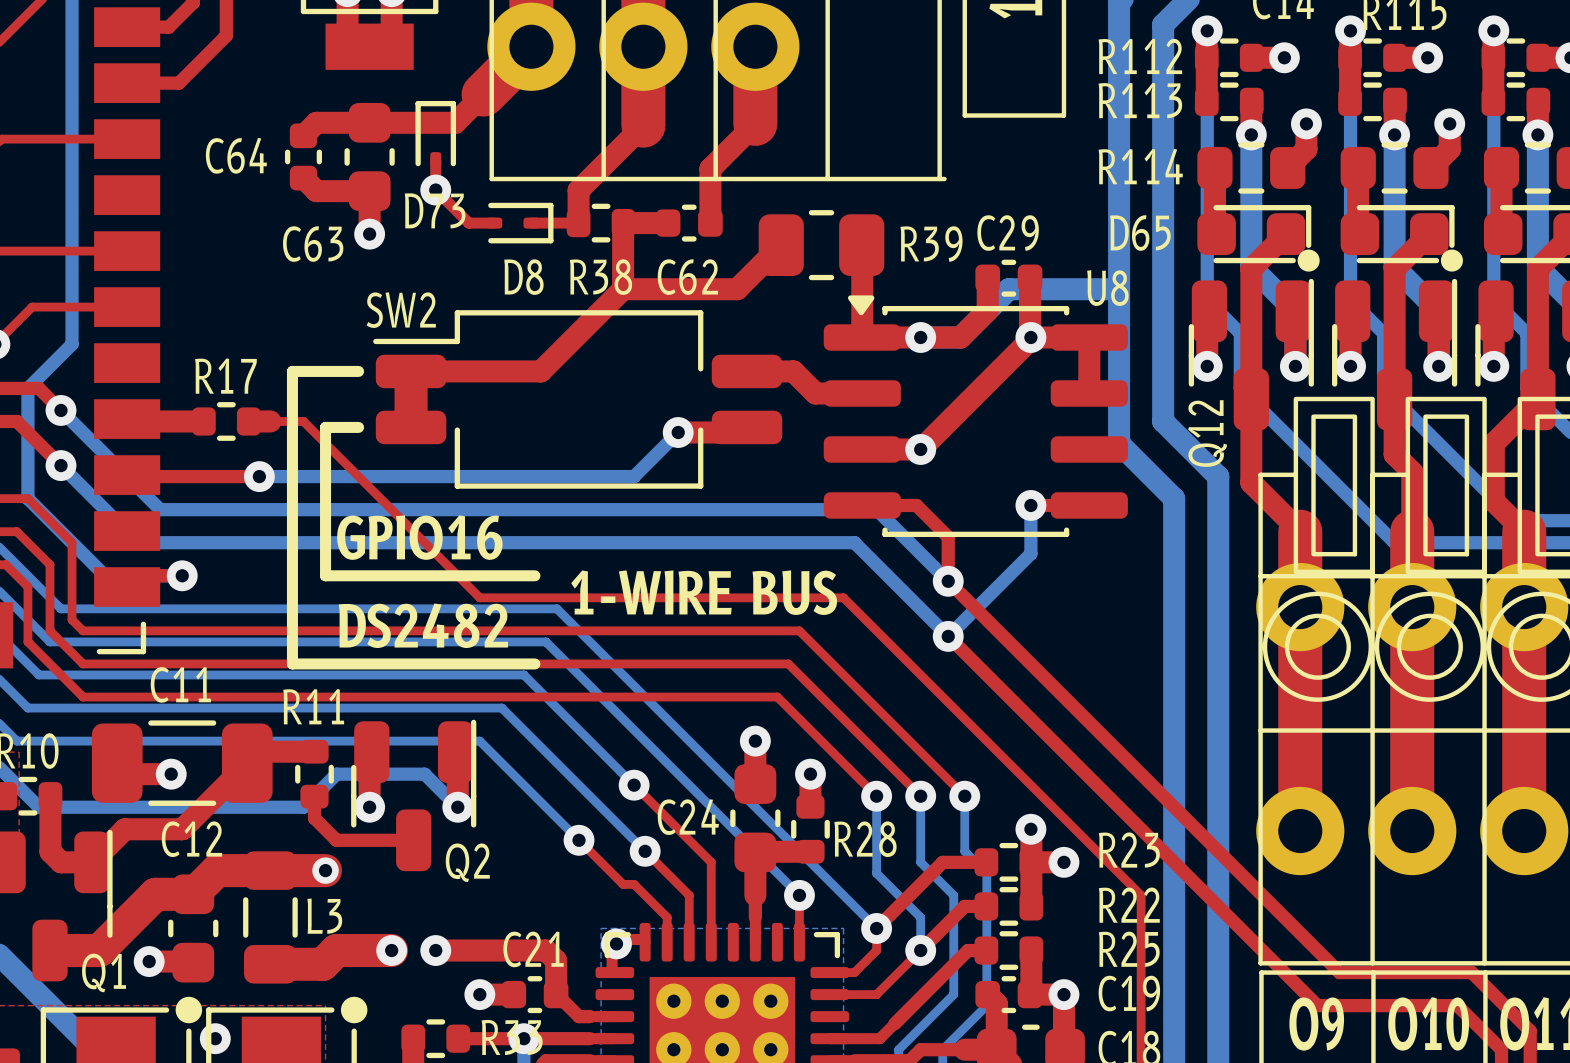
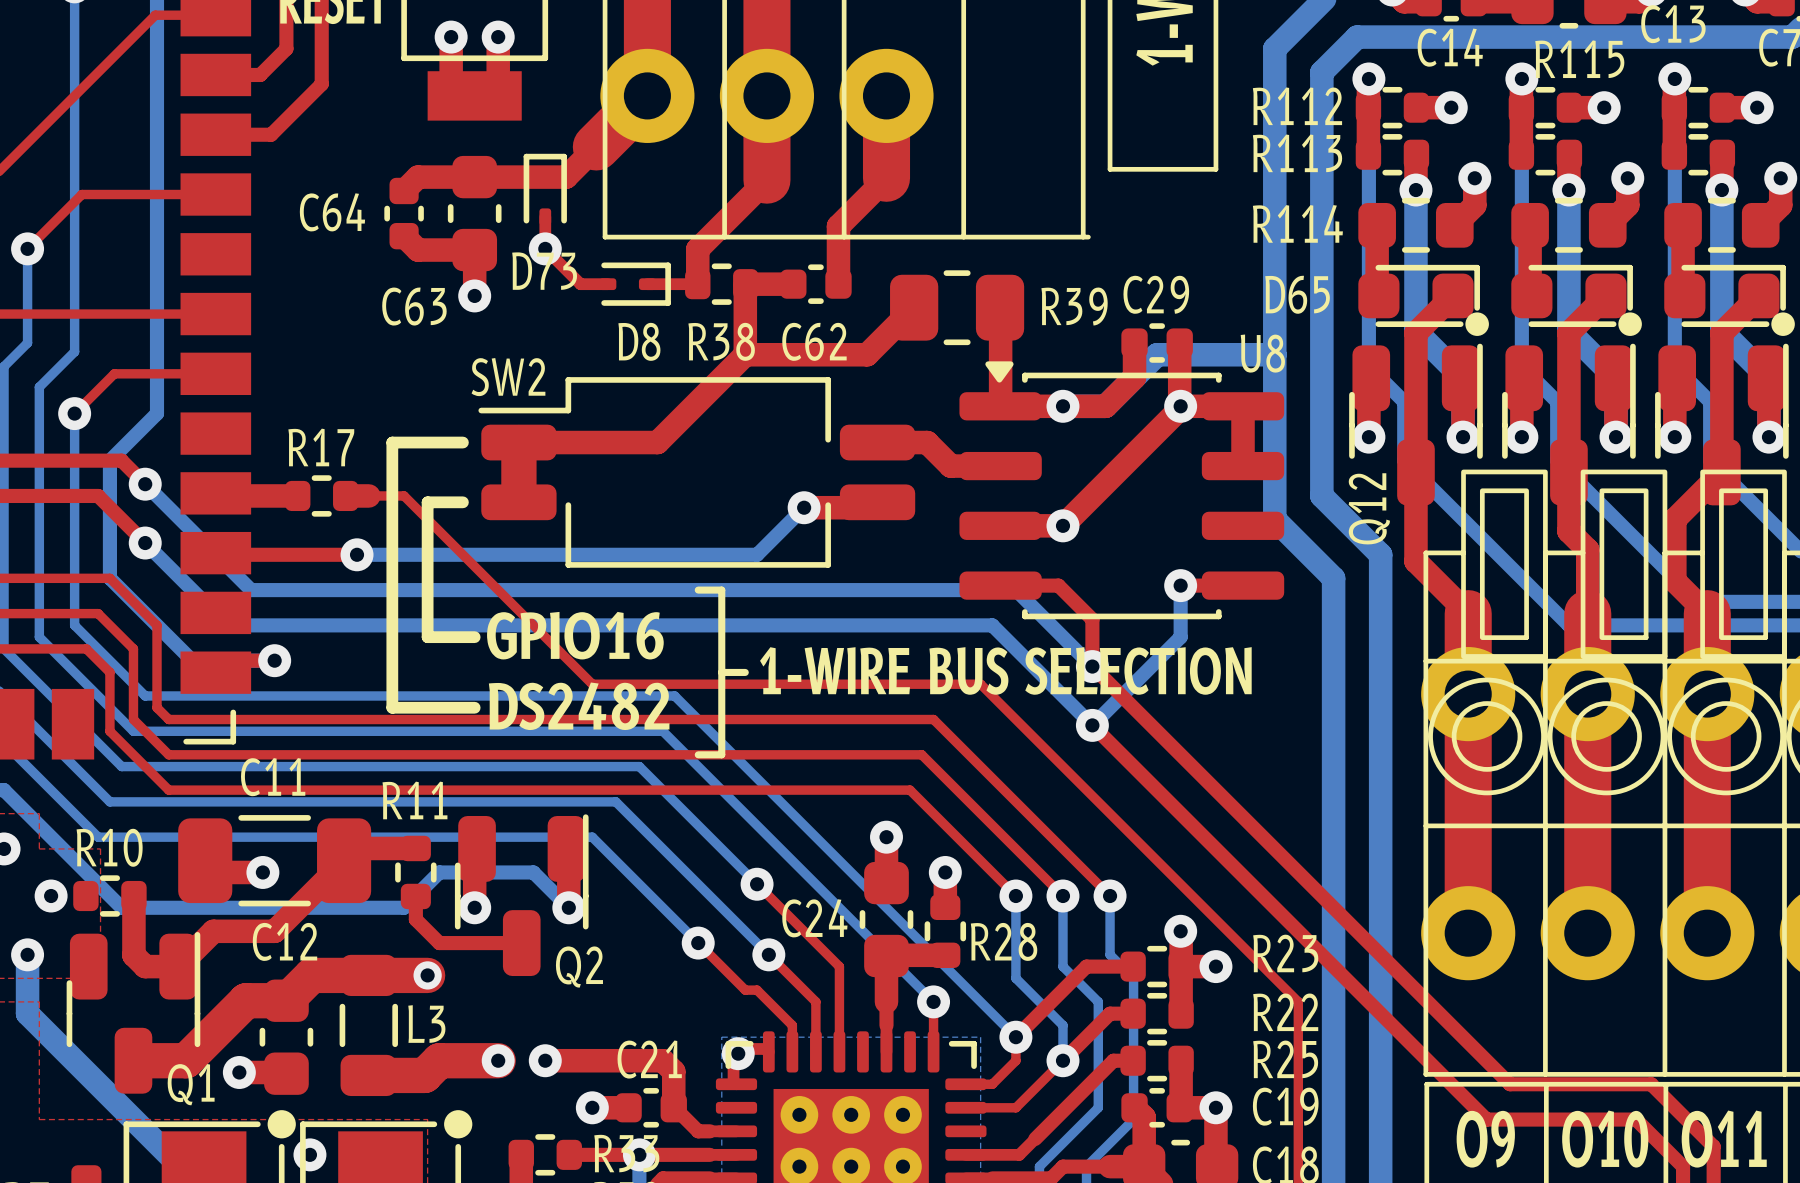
line: none -> (698, 590) (721, 590) (721, 754) (698, 754)
text position: GPIO16 (419, 537) -> GPIO16 (575, 635)
line: (325, 553) (325, 575) (534, 575) -> (427, 637) (474, 637)
line: none -> (721, 672) (745, 672)
text: 1-WIRE BUS (704, 592) -> 1-WIRE BUS SELECTION (1005, 670)
line: (292, 619) (292, 663) (534, 663) -> (392, 707) (474, 707)
text position: DS2482 (423, 625) -> DS2482 (579, 706)

